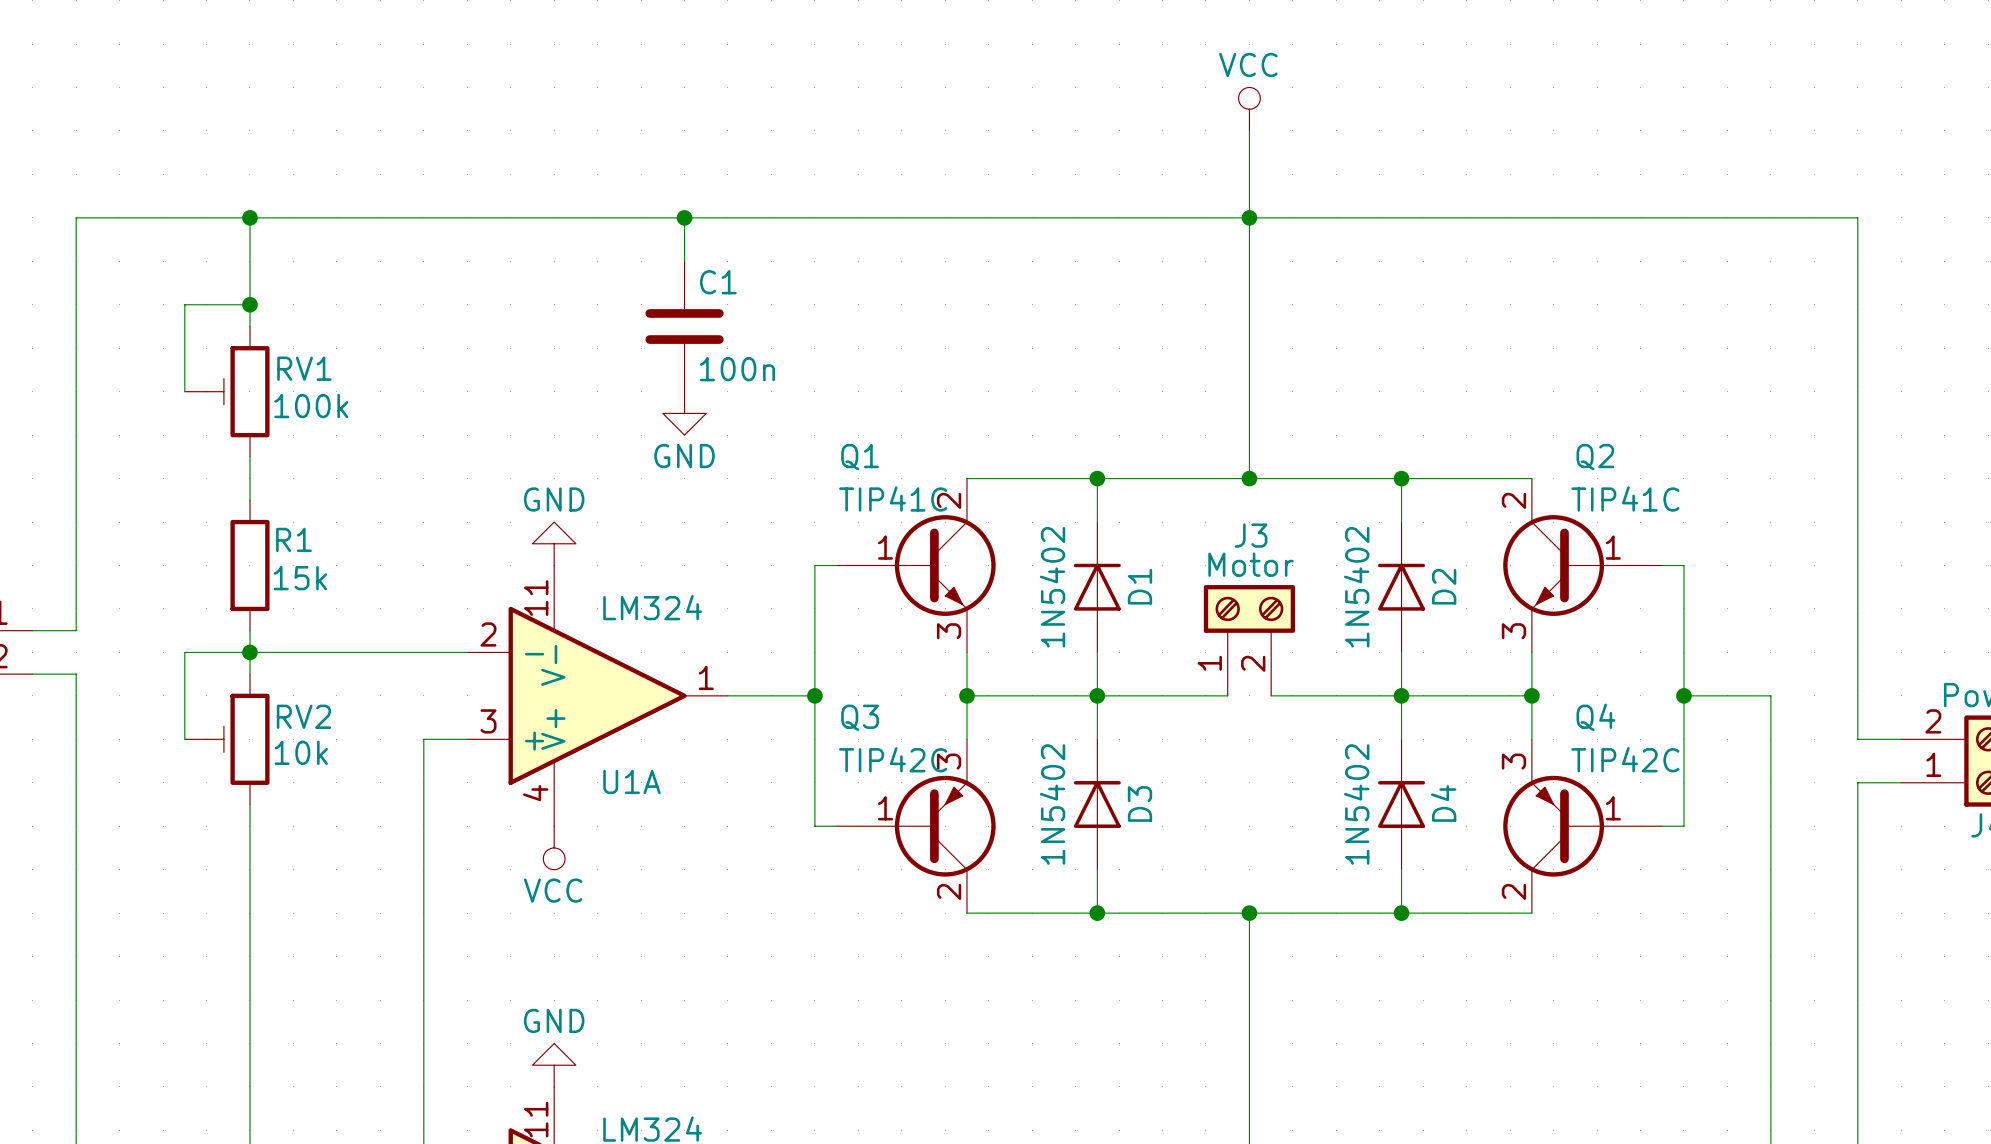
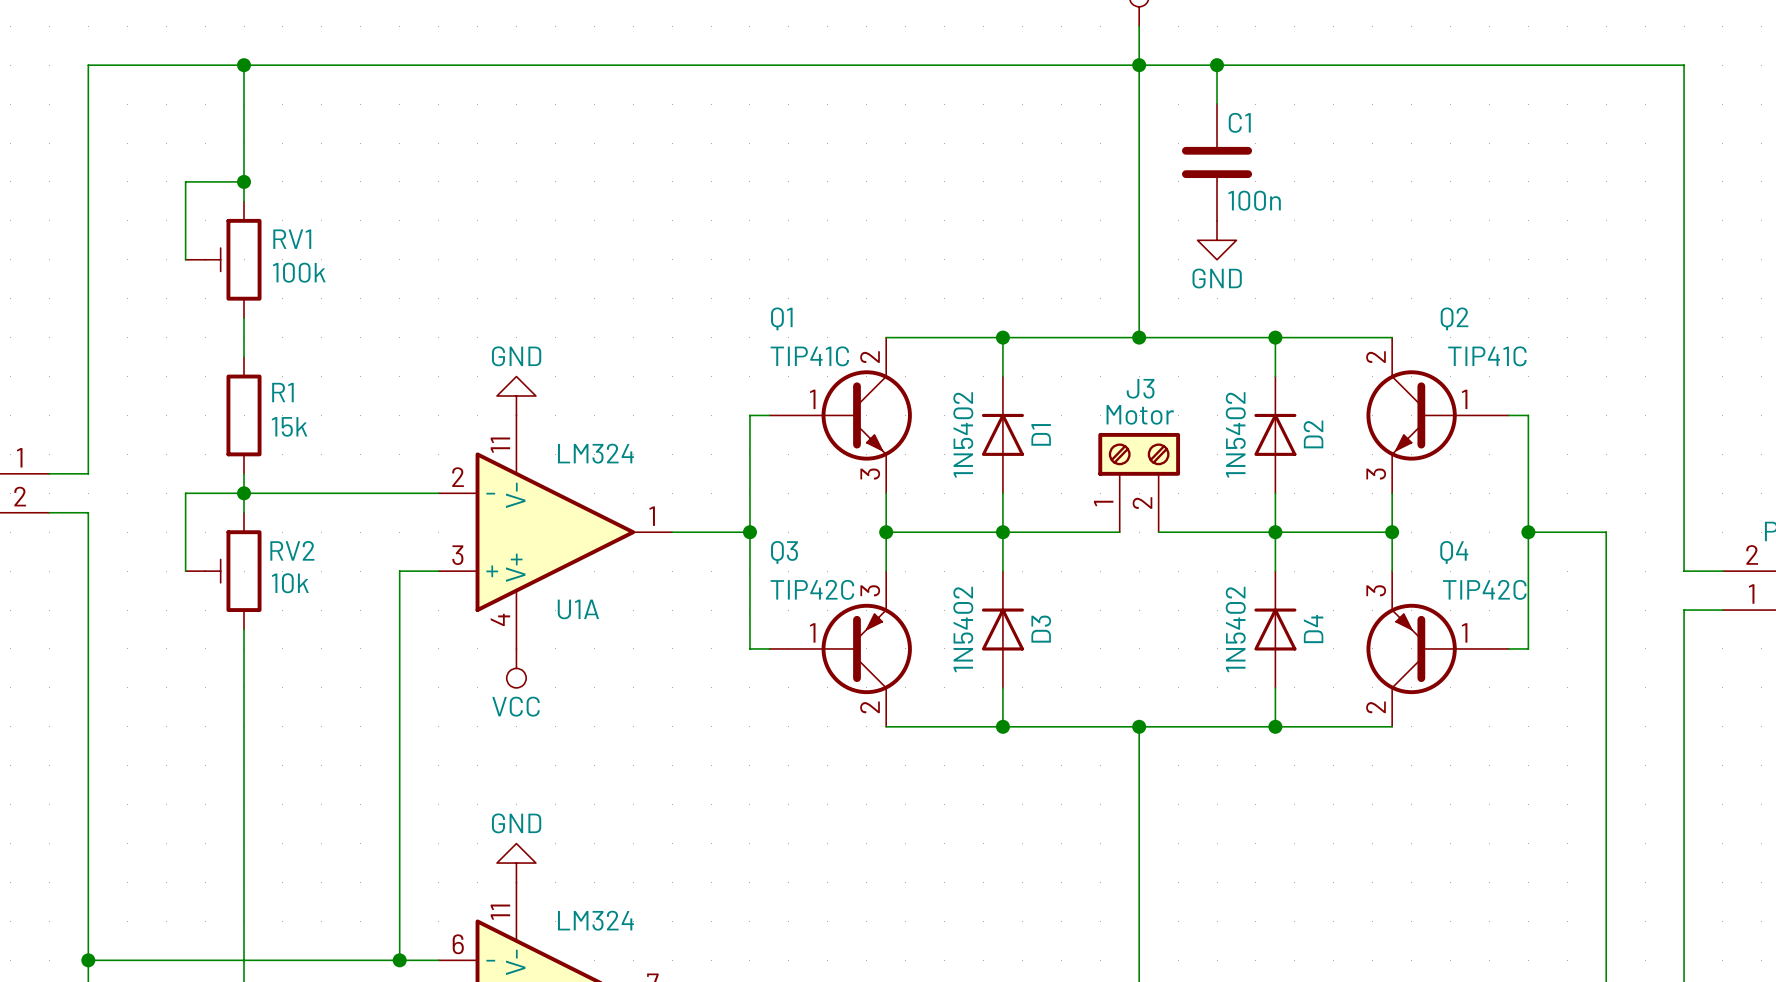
wire: none -> (244, 65) (244, 104)
wire: none -> (1217, 65) (1217, 104)
junction: none -> (1217, 65)
wire: (76, 217) (1857, 217) -> (88, 104) (88, 65) (1684, 65) (1684, 104)
junction position: (249, 217) -> (244, 65)
wire: (684, 217) (684, 261) -> none
junction: (684, 217) -> none
junction position: (1249, 217) -> (1139, 65)
C1 position: (684, 326) -> (1217, 162)
power symbol: none -> GND (1217, 240)
power symbol: GND (684, 413) -> none

